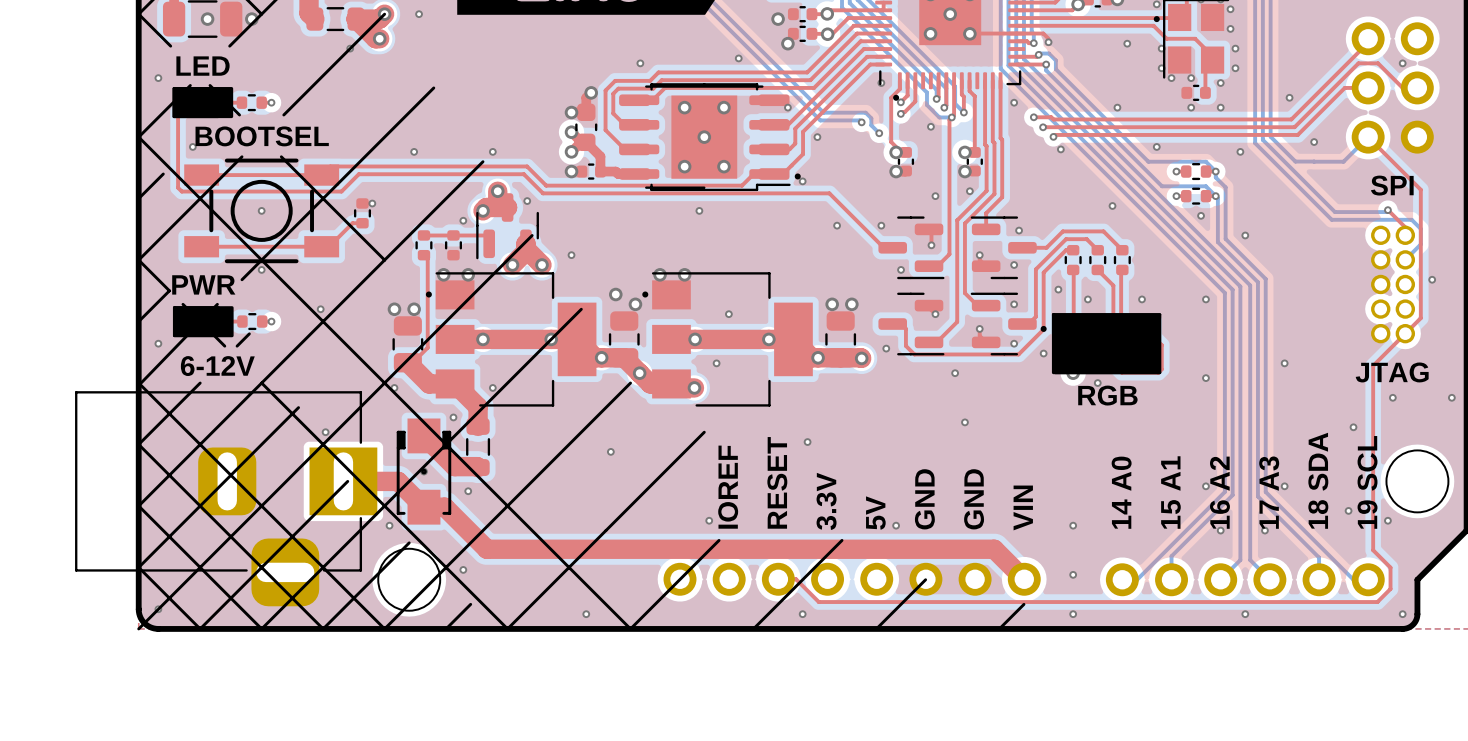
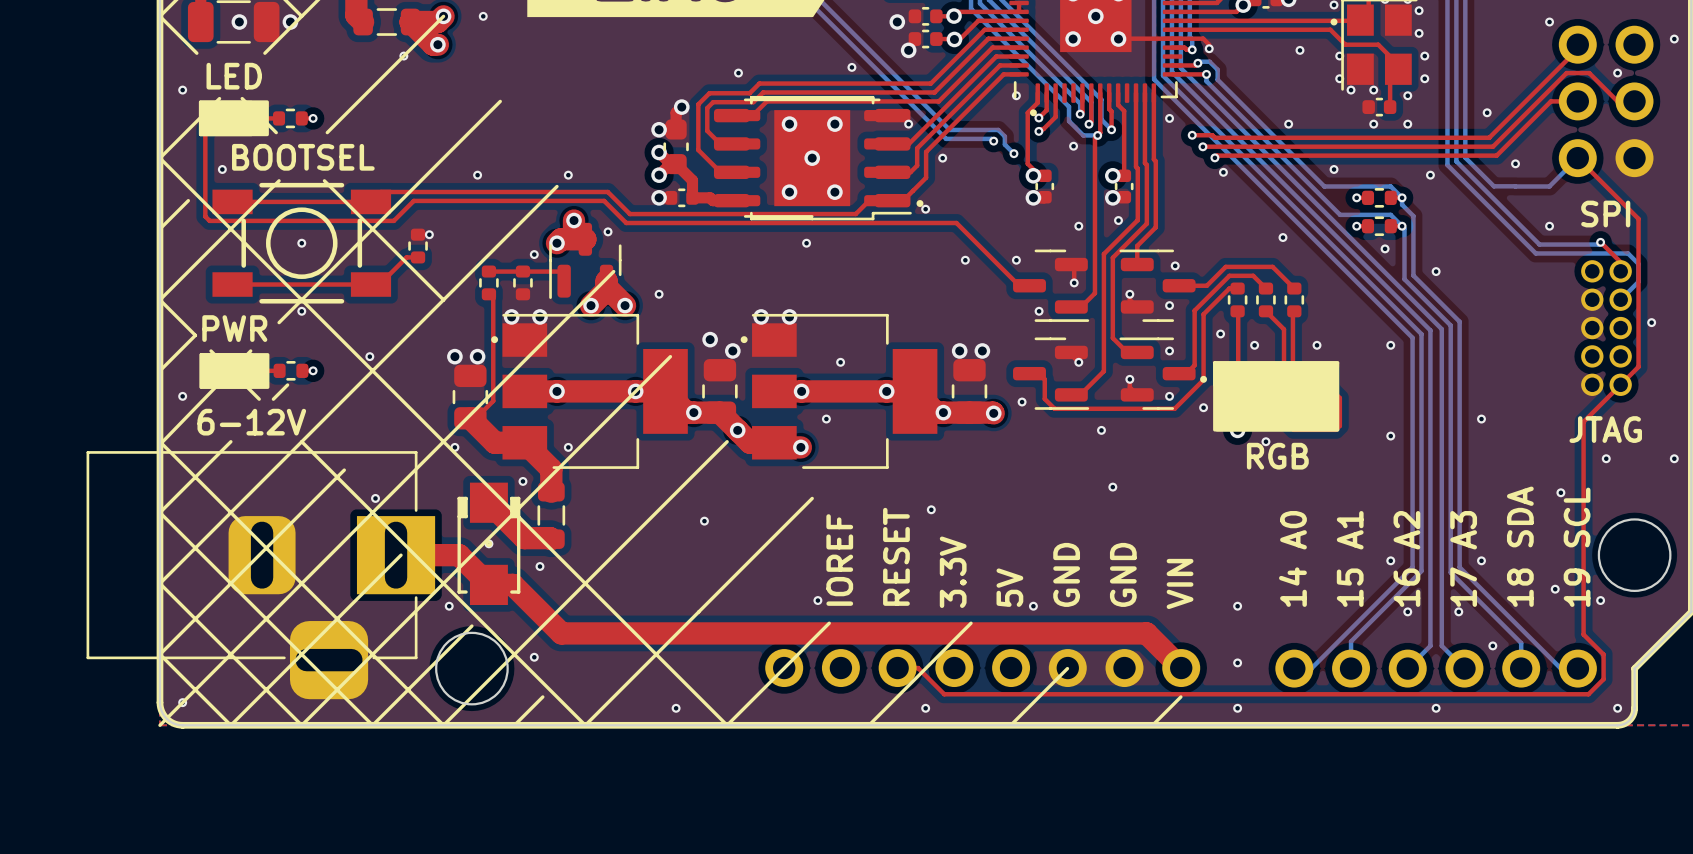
via: none -> (1549, 22)
via: none -> (1674, 39)
via: none -> (1549, 226)
via: none -> (1492, 645)

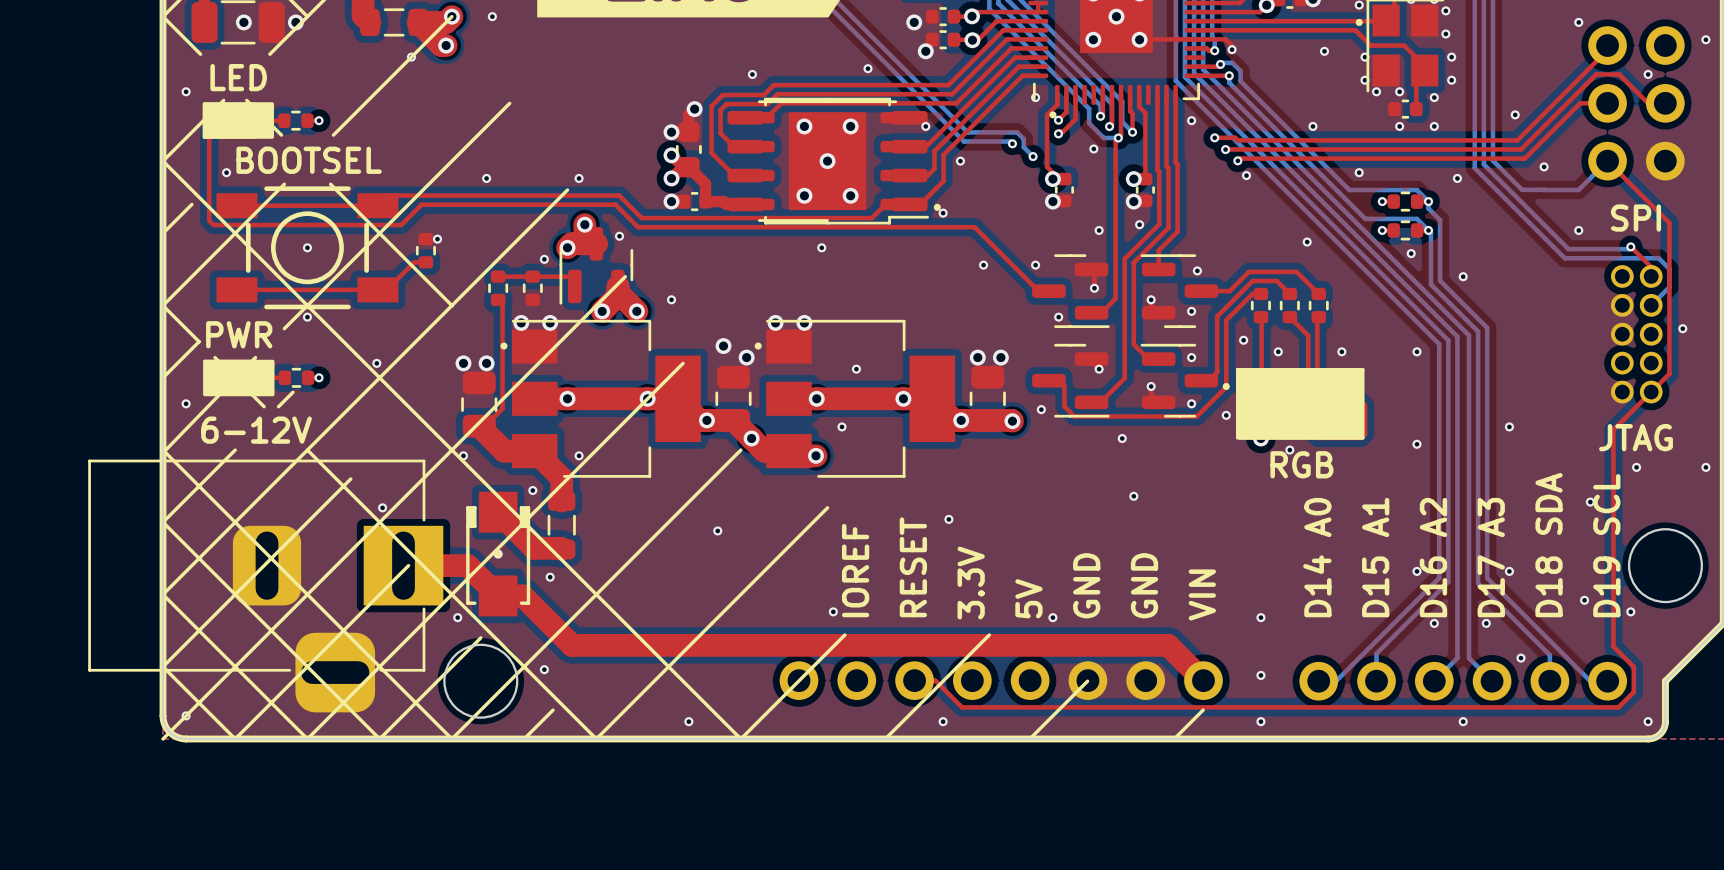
text: 18 SDA (1520, 546) -> D18 SDA (1549, 545)
text: 19 SCL (1577, 547) -> D19 SCL (1606, 545)
text: 14 A0 (1292, 558) -> D14 A0 (1317, 557)
text: 15 A1 (1350, 558) -> D15 A1 (1375, 557)
text: 16 A2 (1406, 558) -> D16 A2 (1433, 557)
text: 17 A3 (1463, 558) -> D17 A3 (1491, 557)

